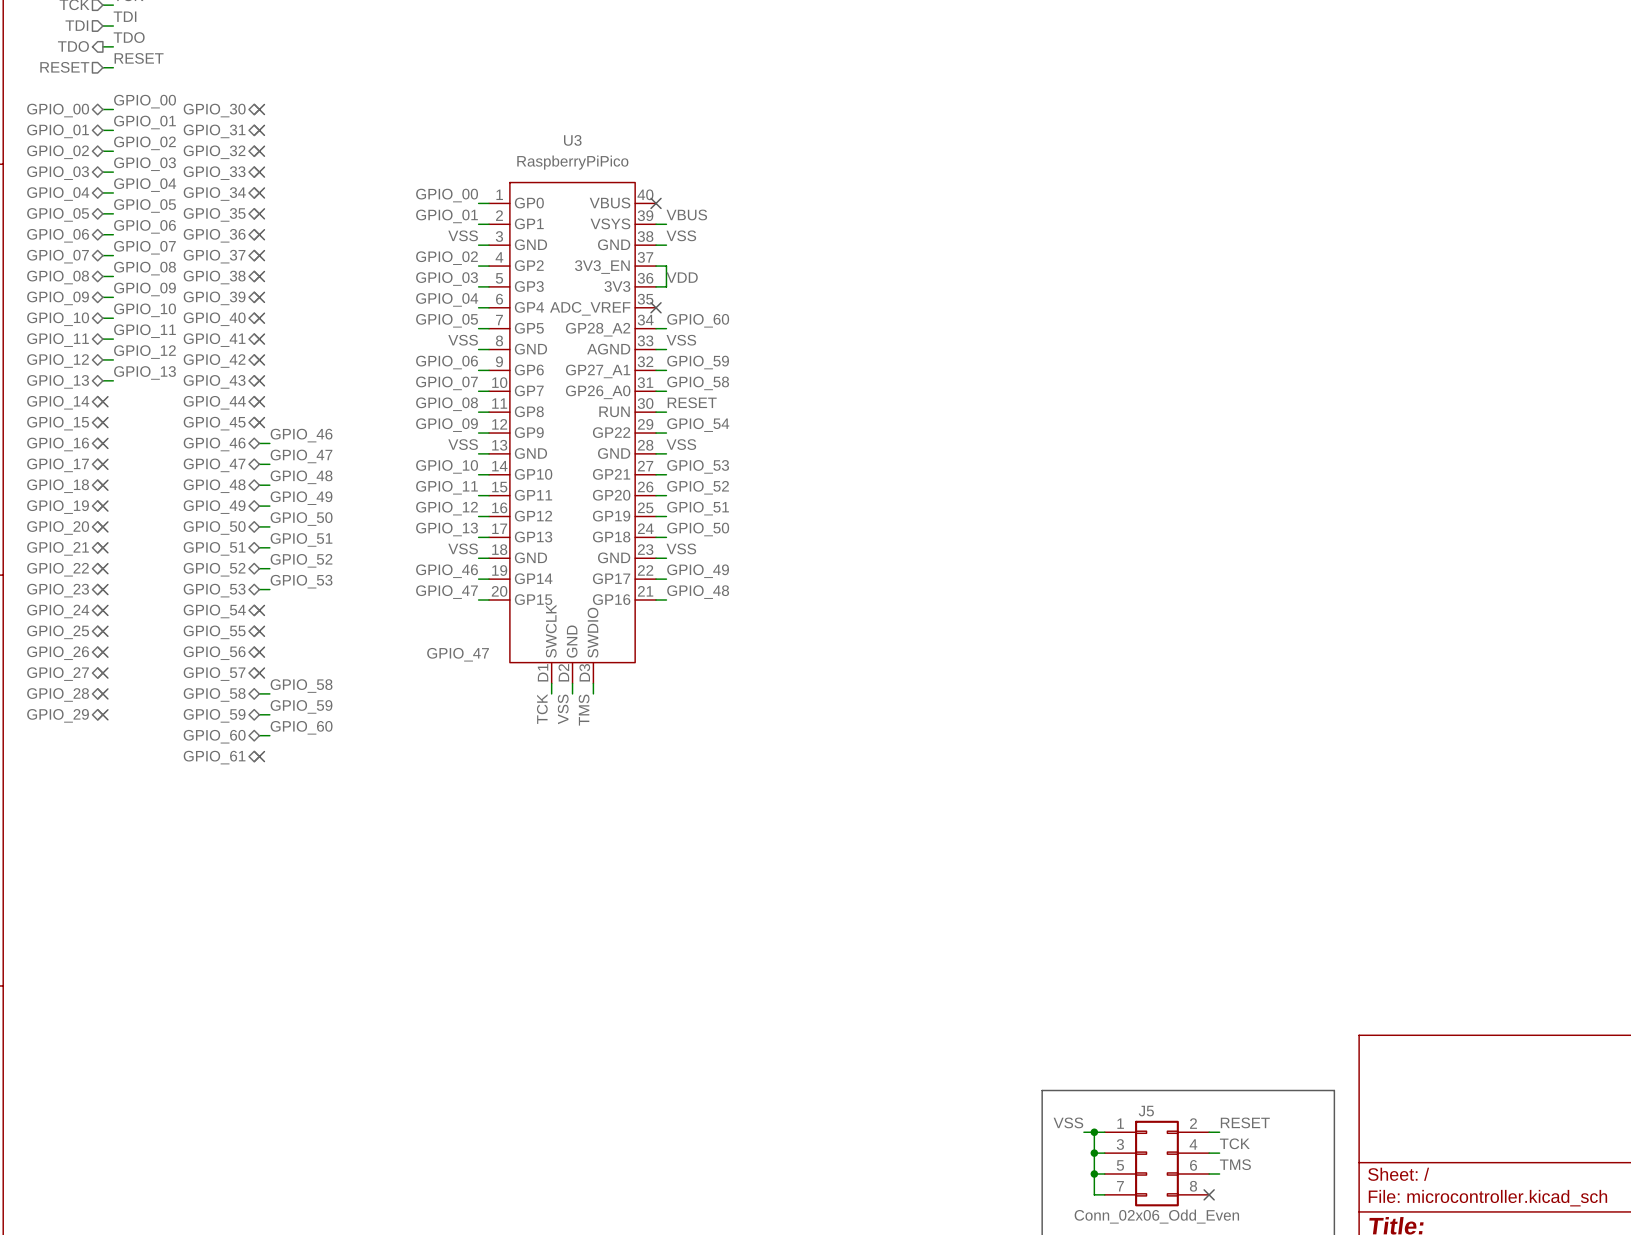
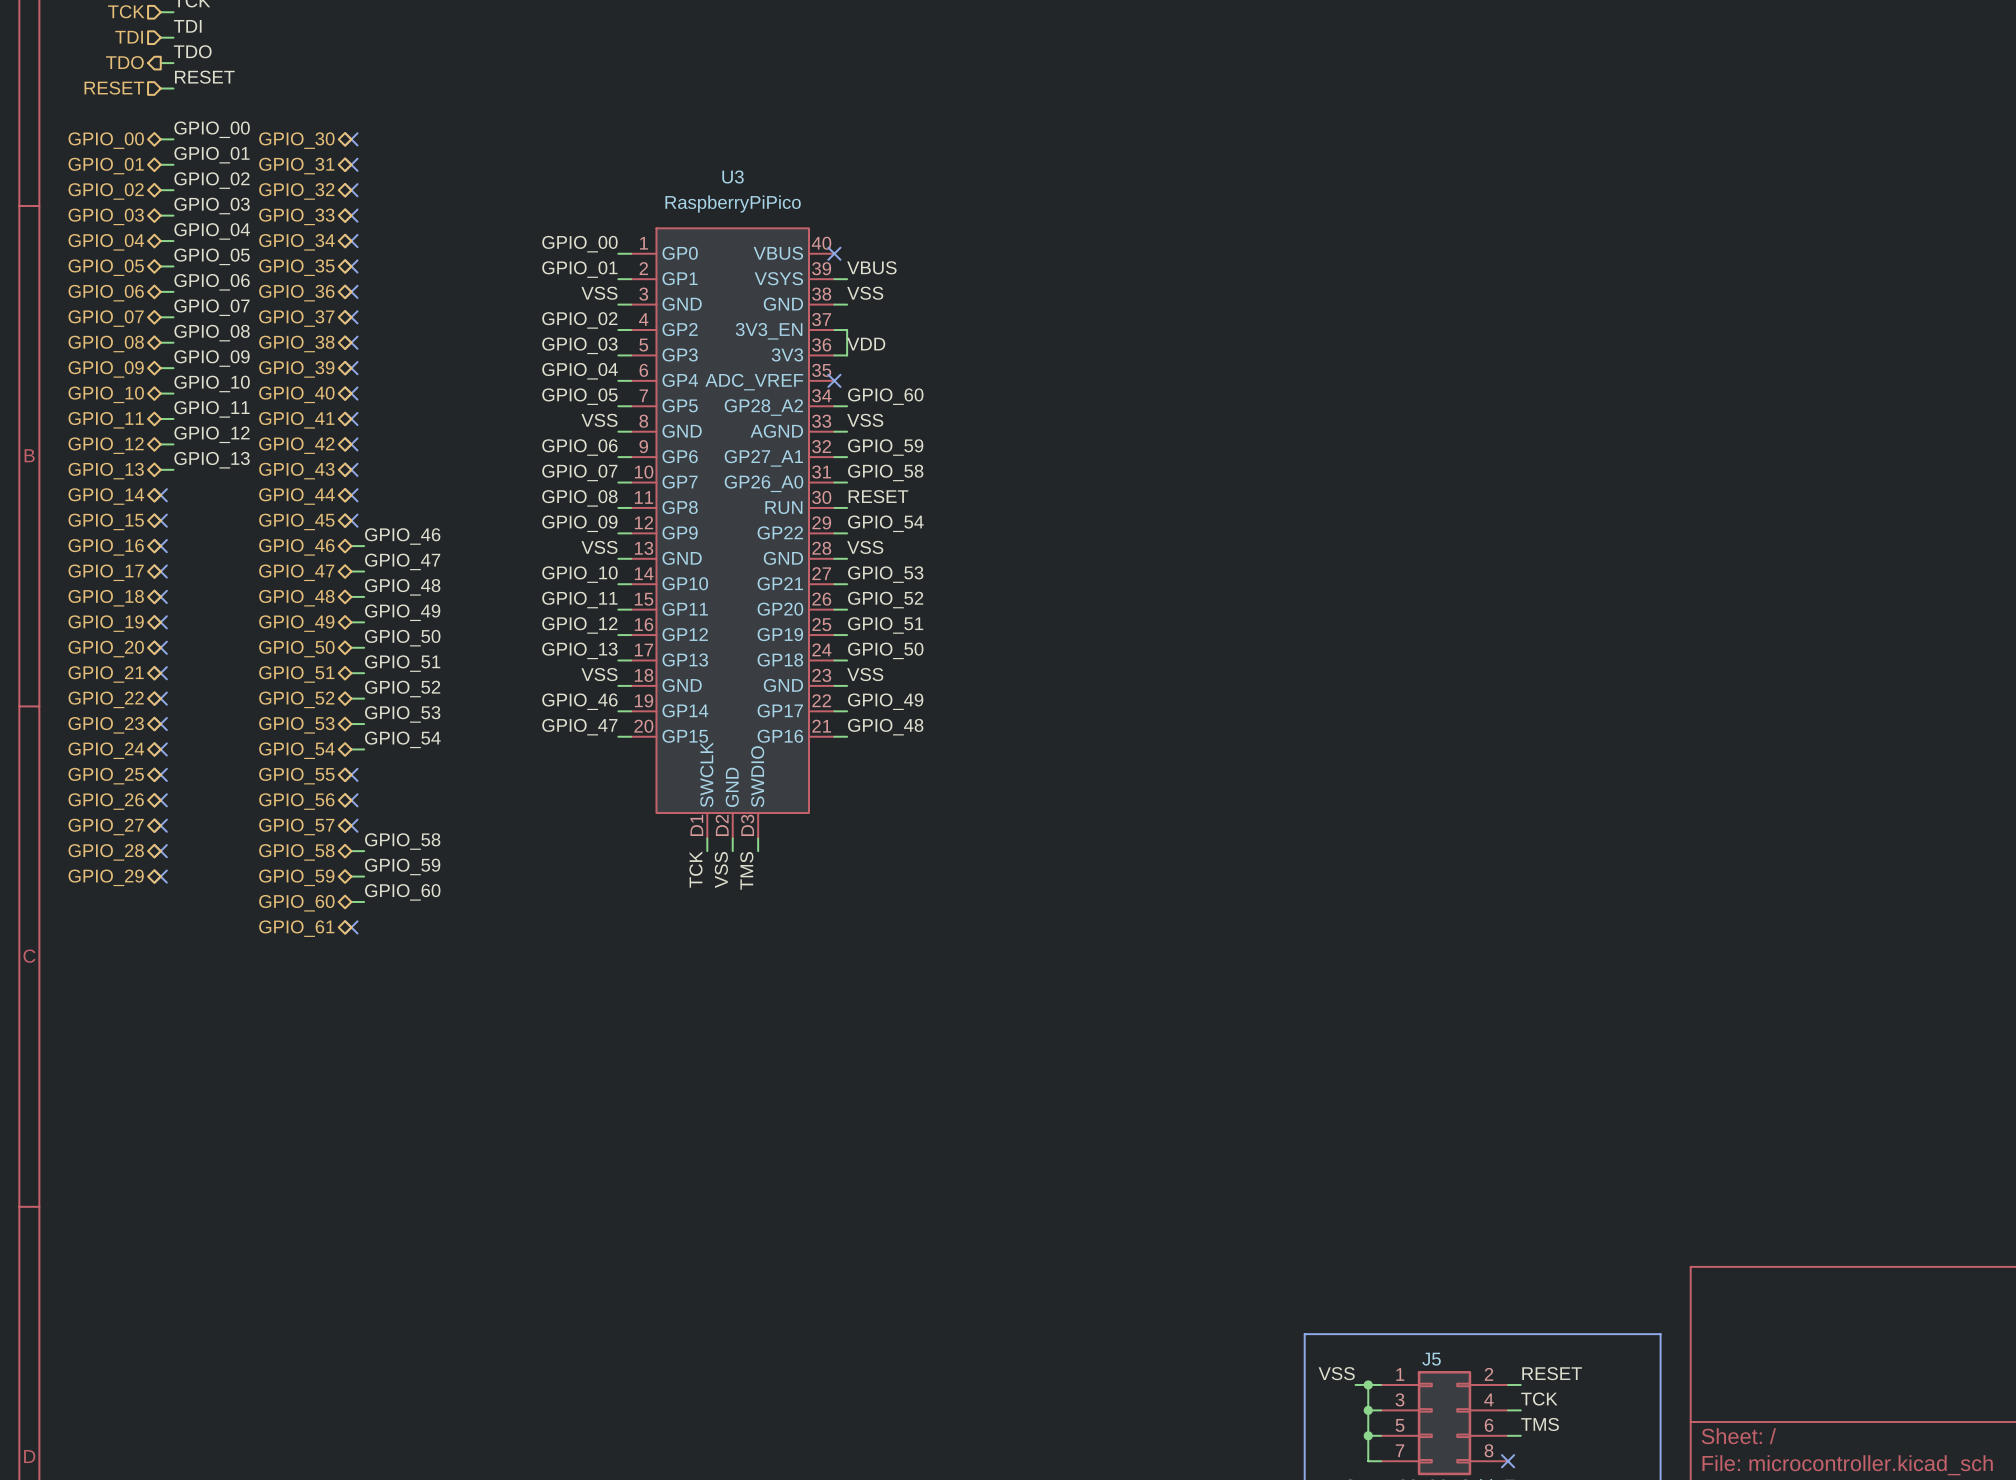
label: none -> GPIO_54 (402, 739)
wire: none -> (351, 749) (364, 749)
no-connect mark: (259, 610) -> none
label: GPIO_47 (458, 654) -> none

